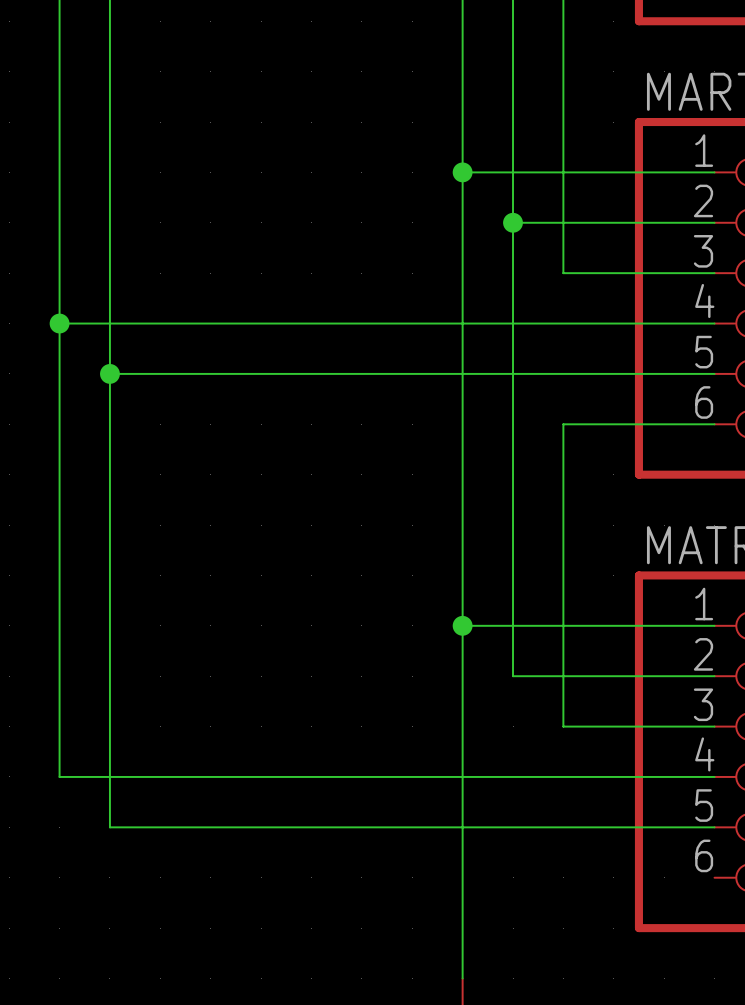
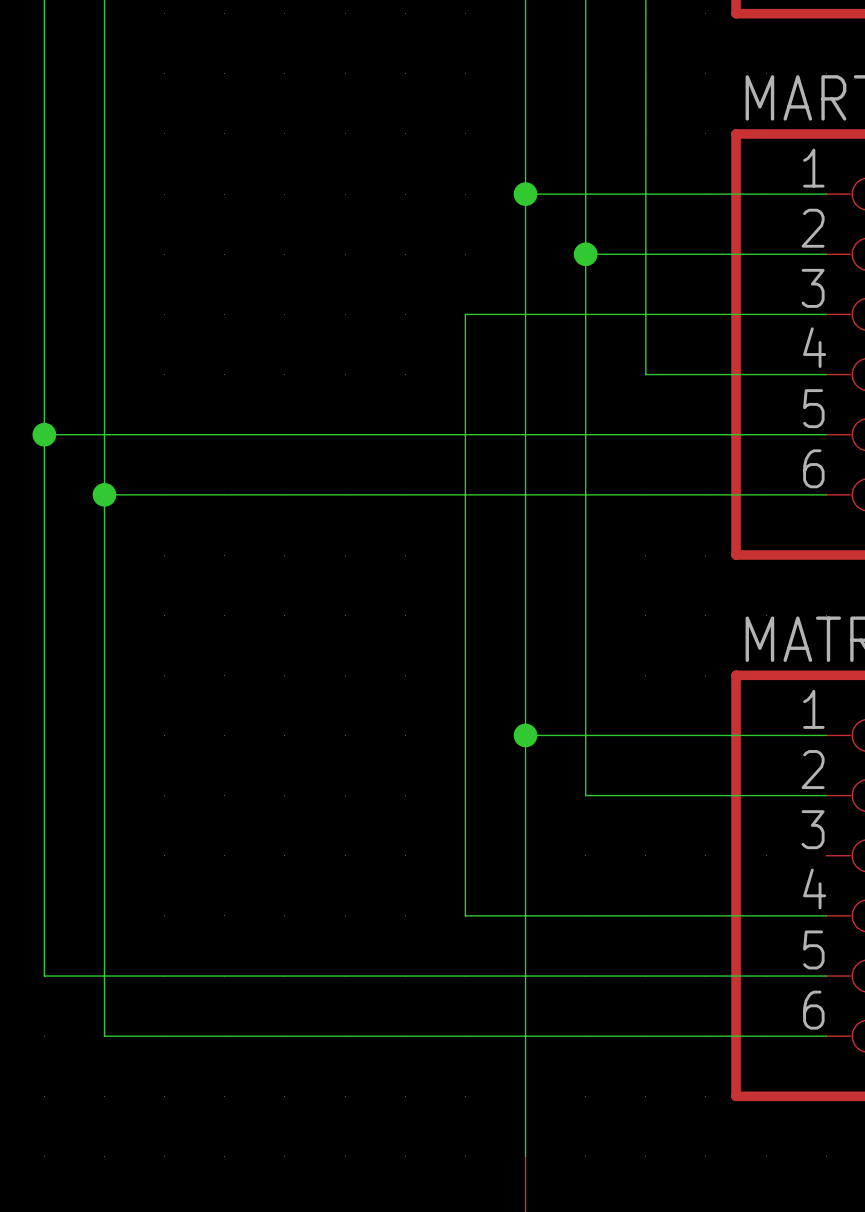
wire: (59, 323) (563, 323) -> (465, 915) (465, 314) (645, 314) (645, 374)
junction: (59, 323) -> none
wire: none -> (44, 434) (104, 434)
junction: none -> (44, 434)
junction: (109, 373) -> none
junction: none -> (104, 494)
wire: (563, 424) (563, 726) (714, 726) -> (645, 494) (104, 494)
wire: (59, 776) (412, 776) -> (44, 915) (44, 976) (104, 976) (104, 1036) (826, 1036)

